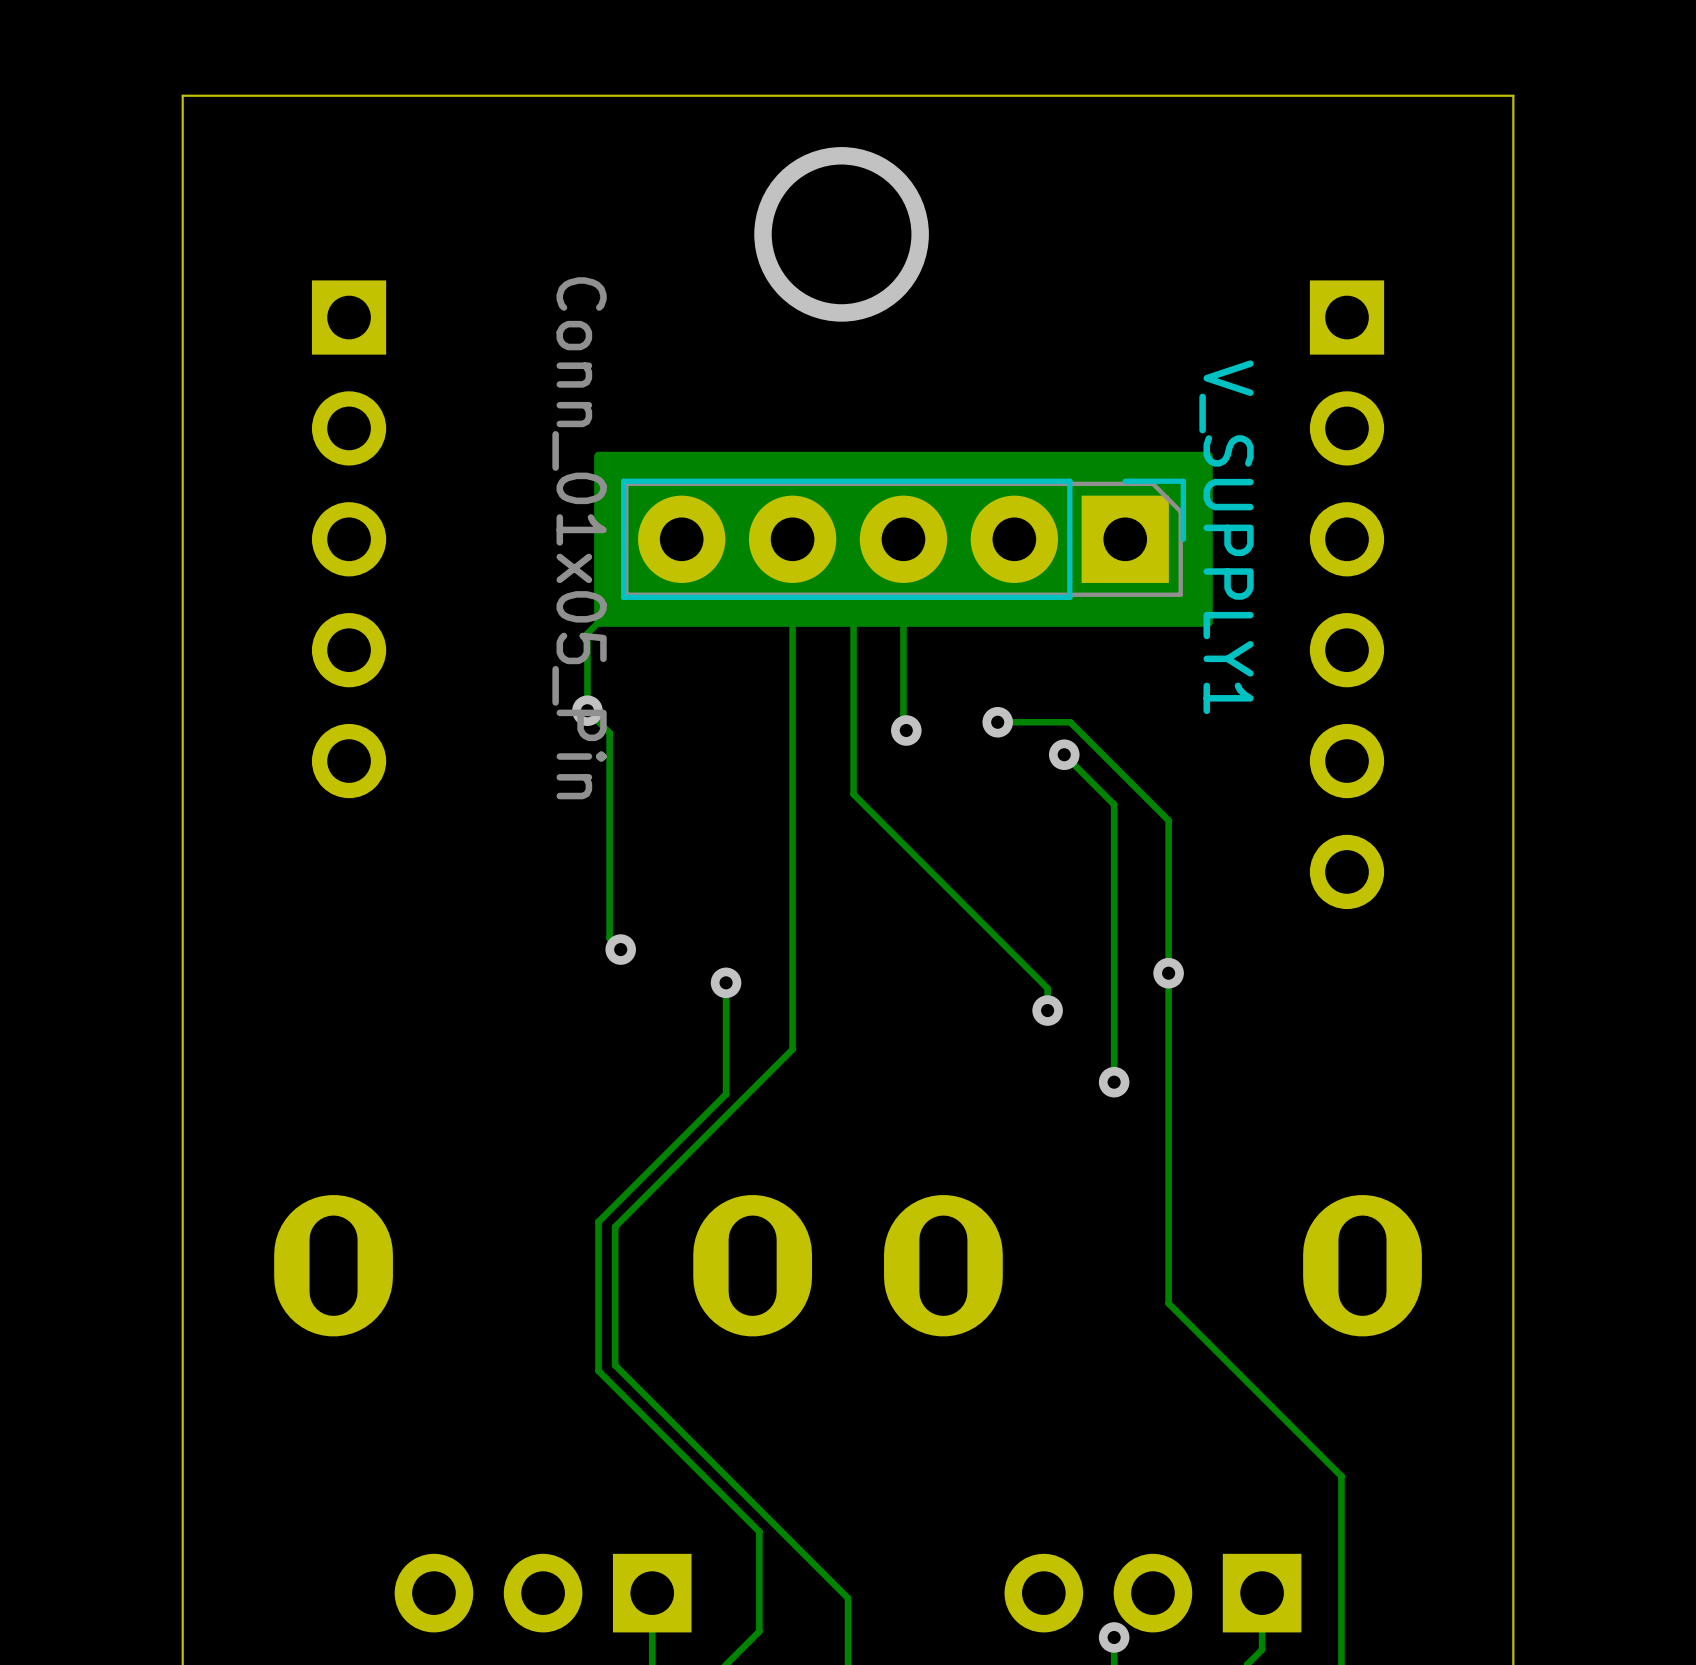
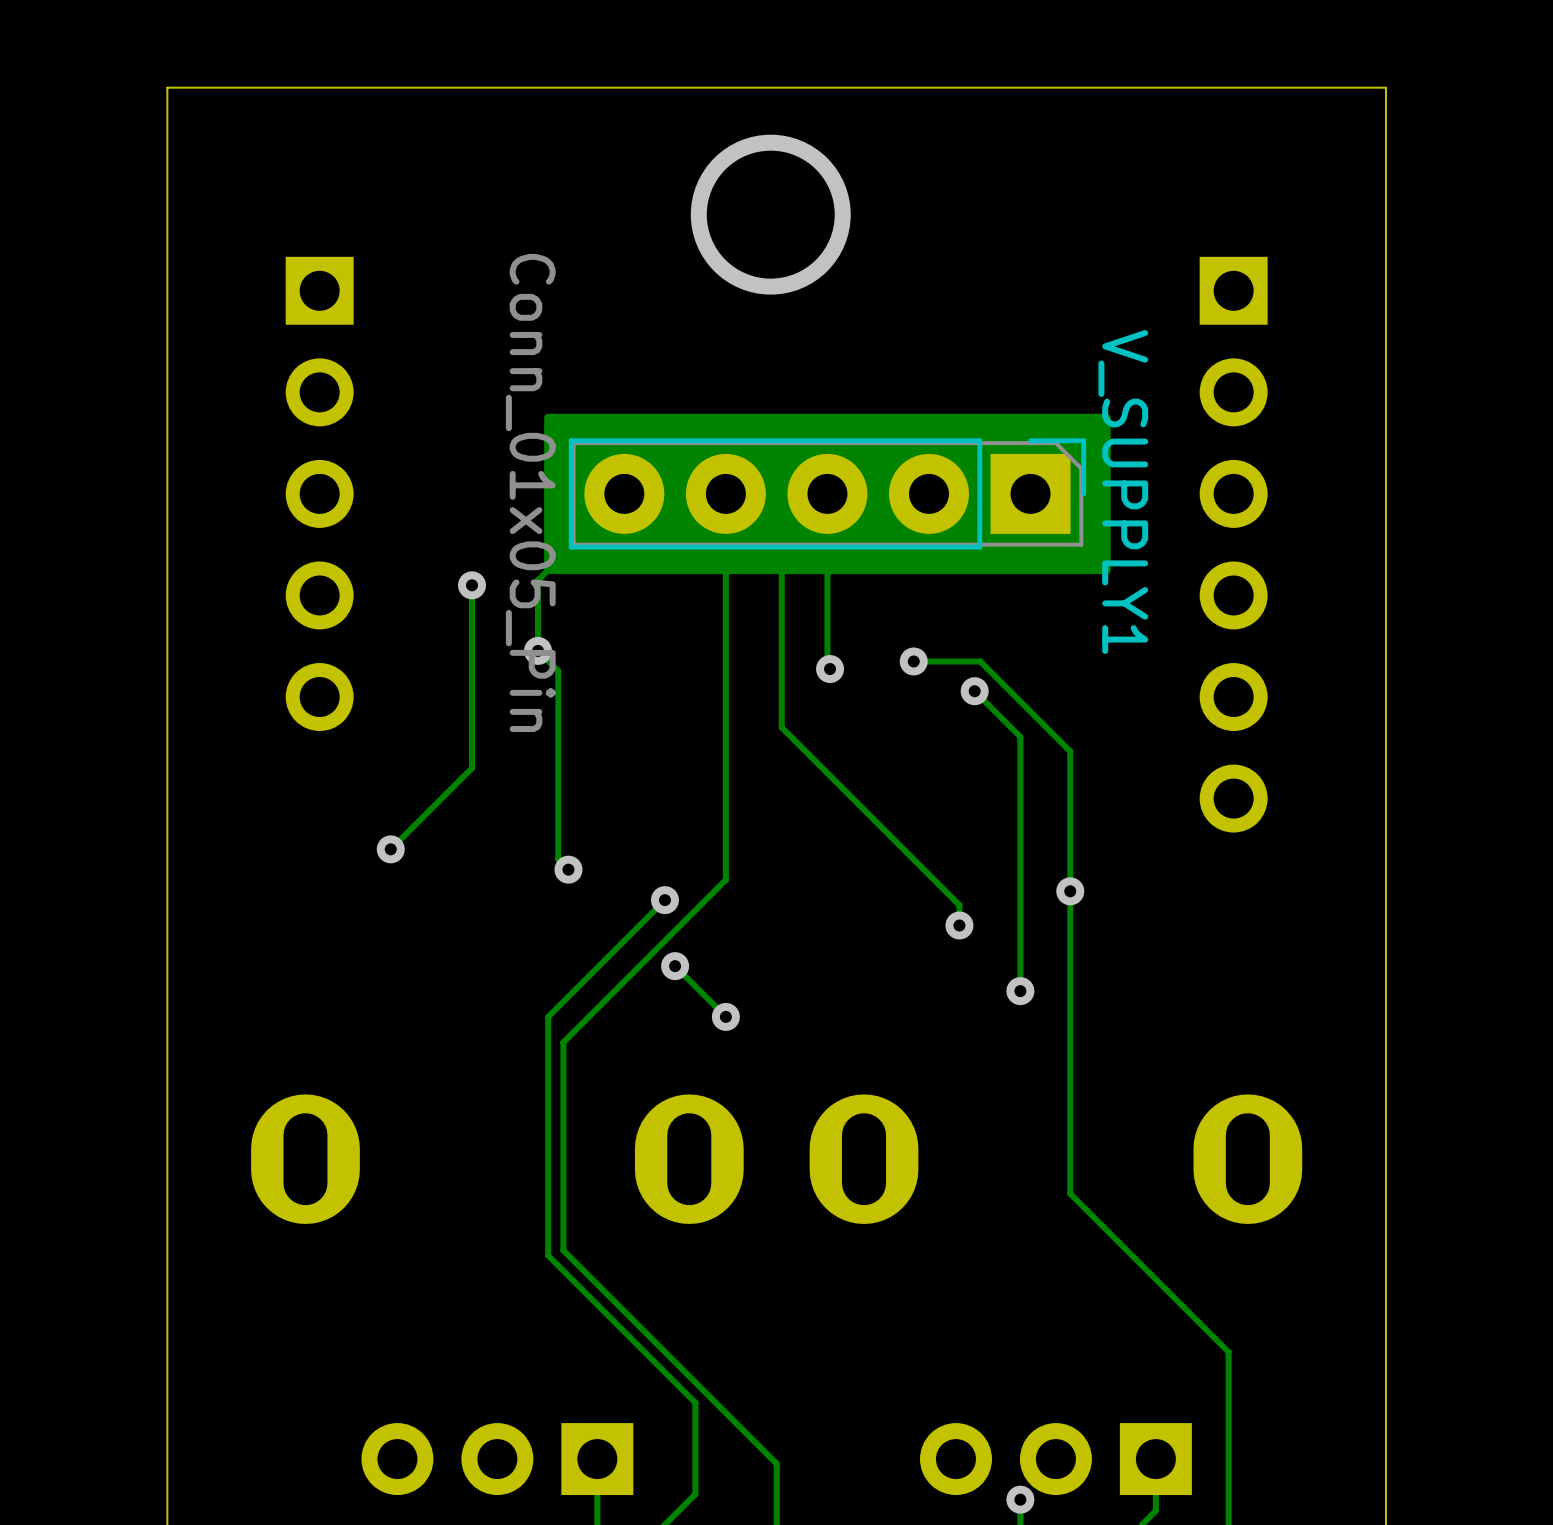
track: none -> (472, 585) (472, 768) (390, 849)
via: none -> (472, 585)
via: none -> (390, 849)
track: (792, 960) (792, 1049) (615, 1226) -> (725, 879) (563, 1042) (563, 1123)
track: (726, 982) (726, 1094) (598, 1221) -> (664, 900) (548, 1016) (548, 1118)
track: none -> (675, 966) (725, 1016)
via: none -> (675, 966)
via: none -> (725, 1016)

